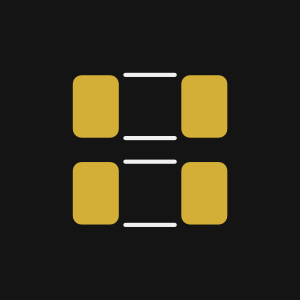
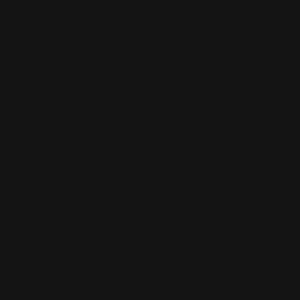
part: (150, 106) -> none
part: (150, 193) -> none

